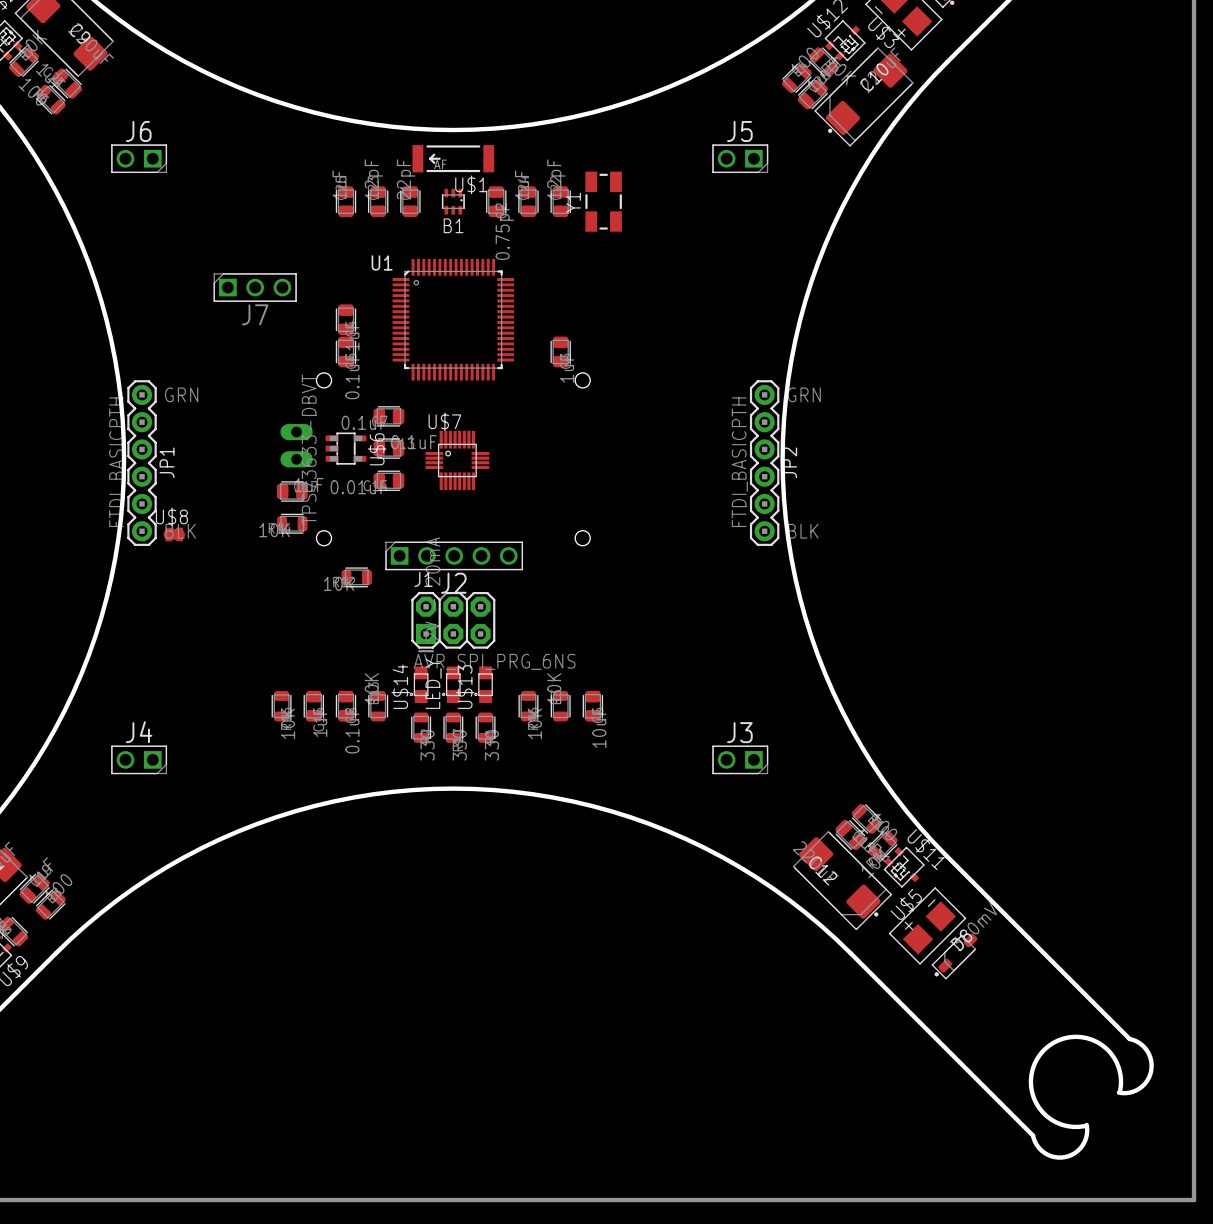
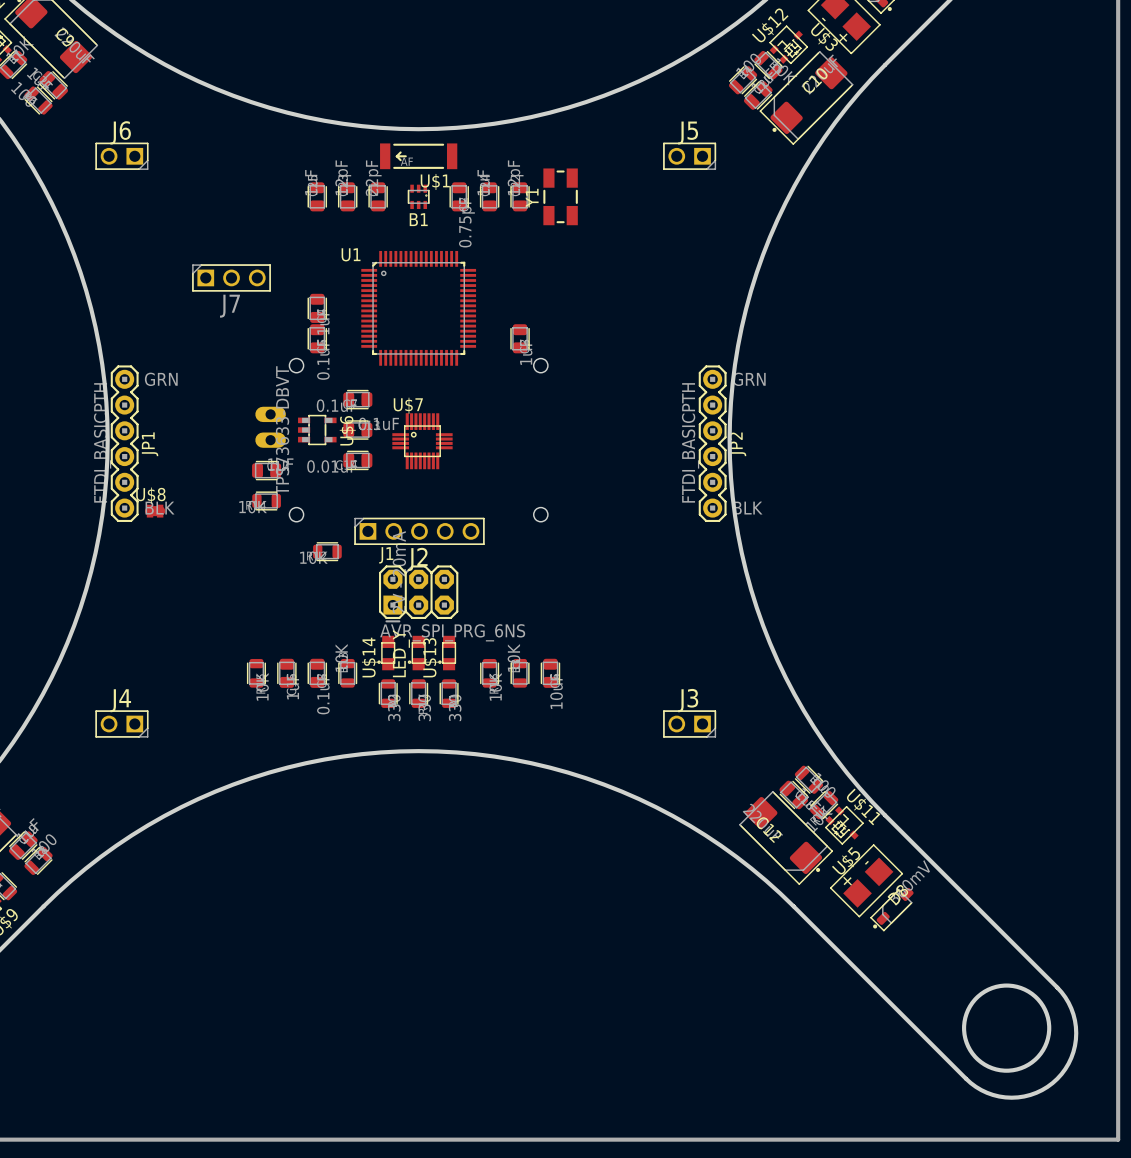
round board edge: none -> [962, 983, 1052, 1073]
board edge: (1129, 1038) (1139, 1043) (1147, 1050) (1151, 1060) (1151, 1071) (1147, 1081) (1139, 1088) (1129, 1092) (1118, 1092) -> (1057, 987) (1071, 1008) (1076, 1033) (1071, 1057) (1057, 1078) (1036, 1092) (1011, 1097) (987, 1092) (966, 1078)
board edge: (1120, 1090) (1120, 1079) (1116, 1062) (1106, 1048) (1097, 1042) (1086, 1038) (1069, 1037) (1053, 1042) (1044, 1049) (1034, 1064) (1031, 1075) (1032, 1092) (1036, 1102) (1042, 1112) (1056, 1122) (1073, 1126) (1084, 1126) -> none
board edge: (1086, 1124) (1086, 1135) (1082, 1145) (1075, 1152) (1065, 1157) (1054, 1157) (1044, 1153) (1037, 1145) (1033, 1135) -> none

